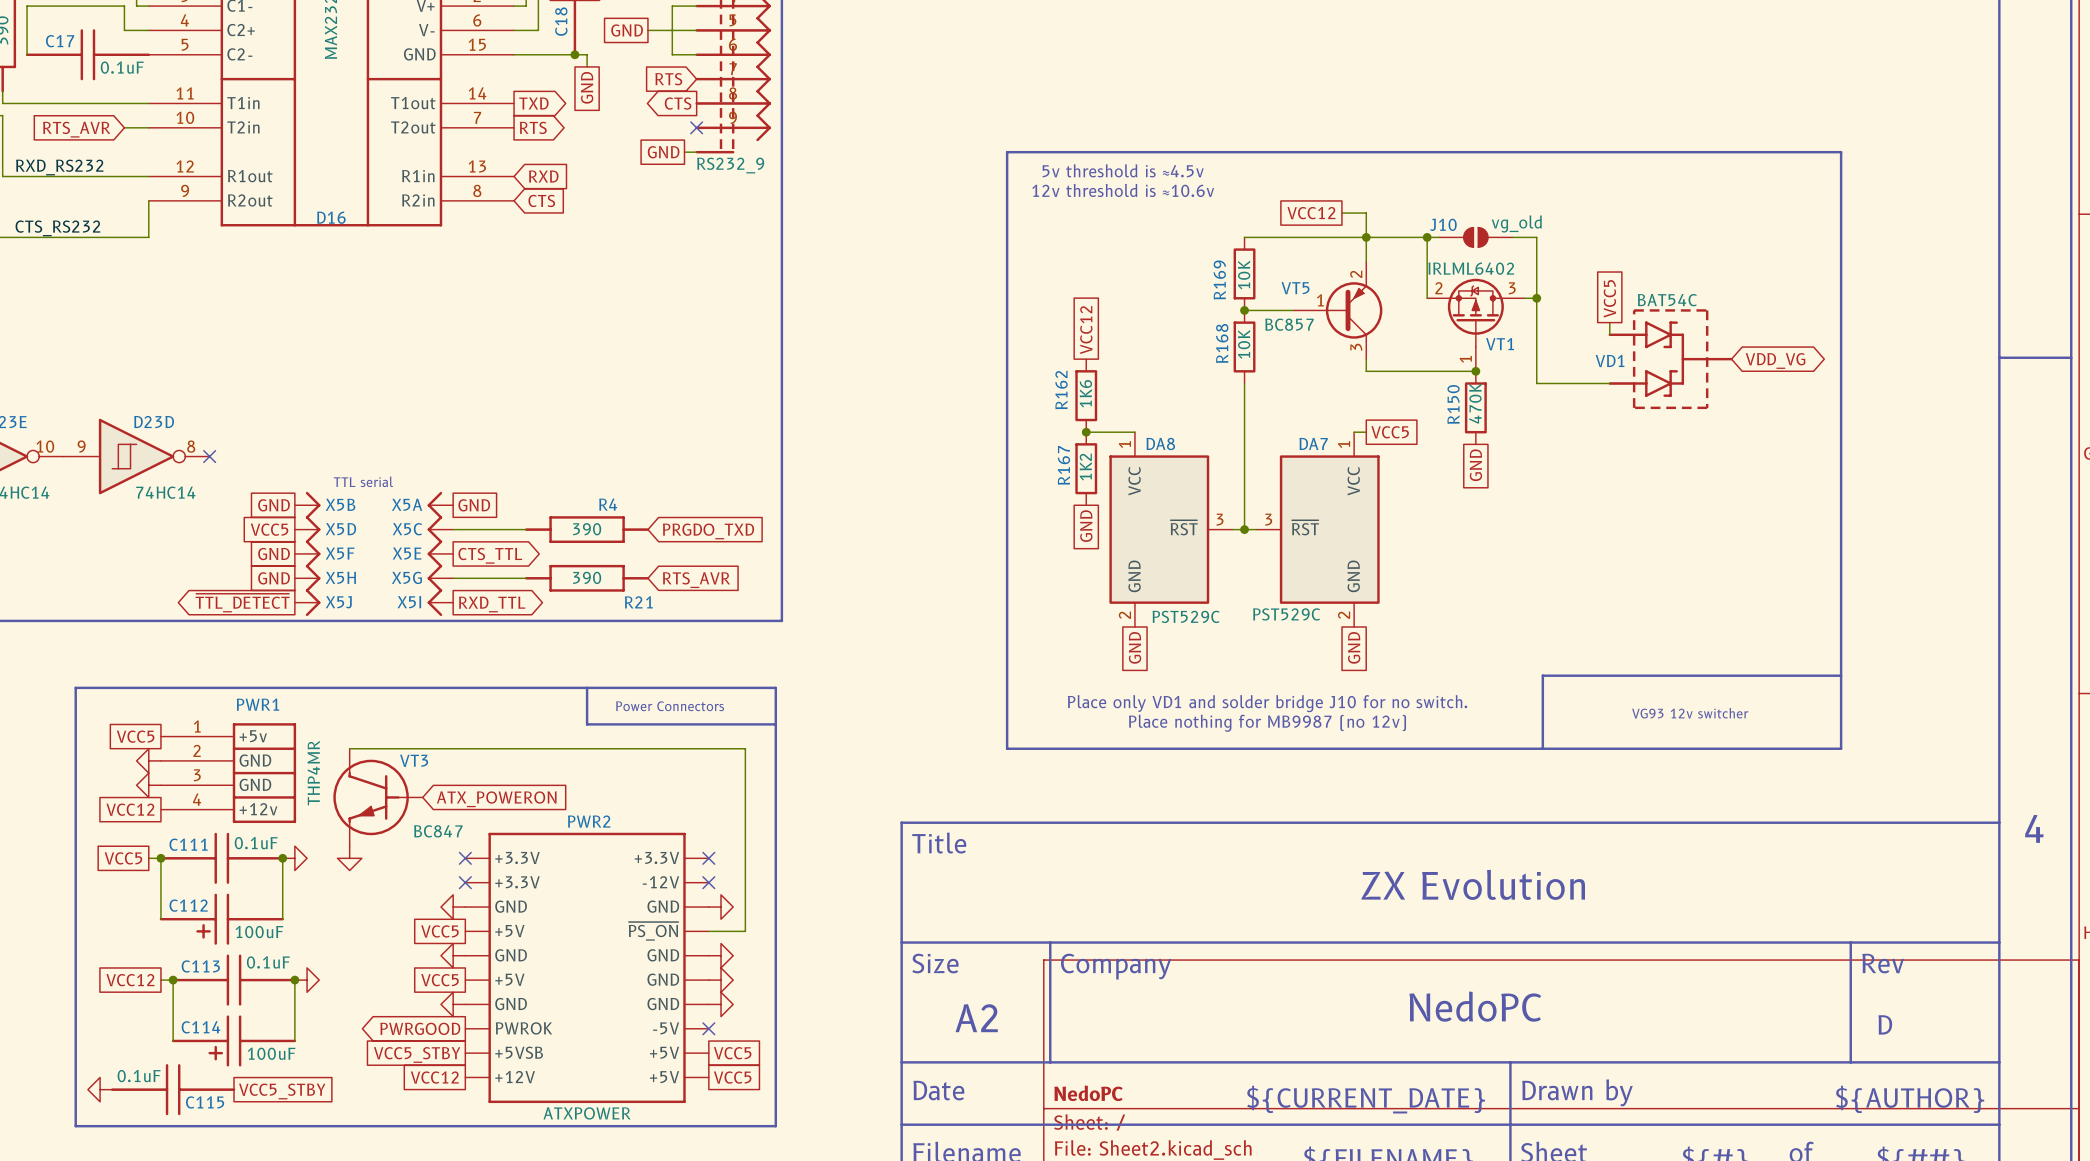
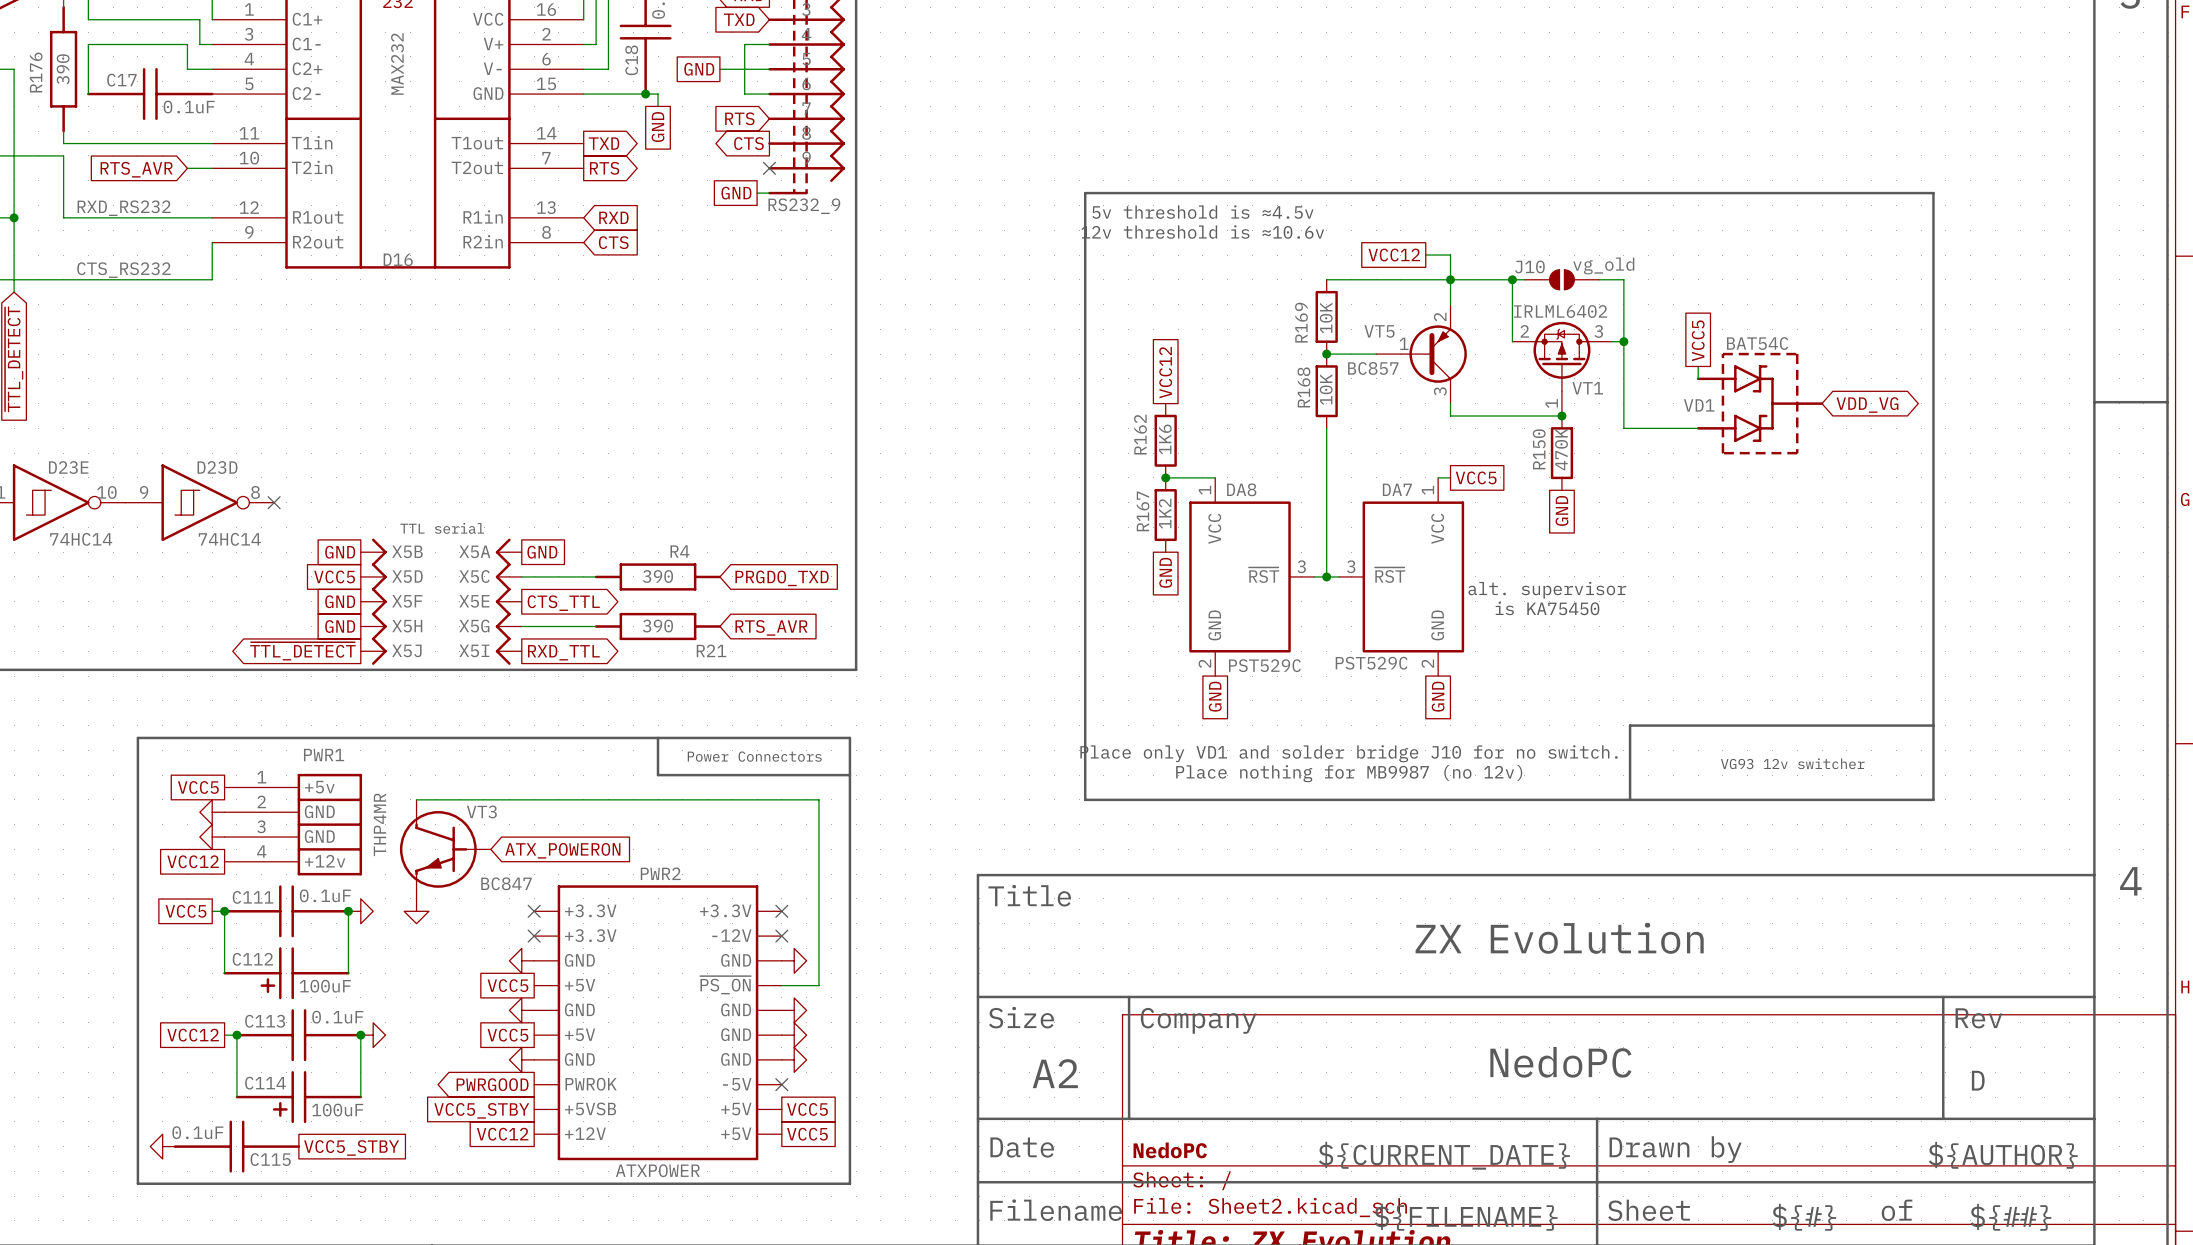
text: none -> alt. supervisor (1547, 590)
text: none -> is KA75450 (1547, 608)

